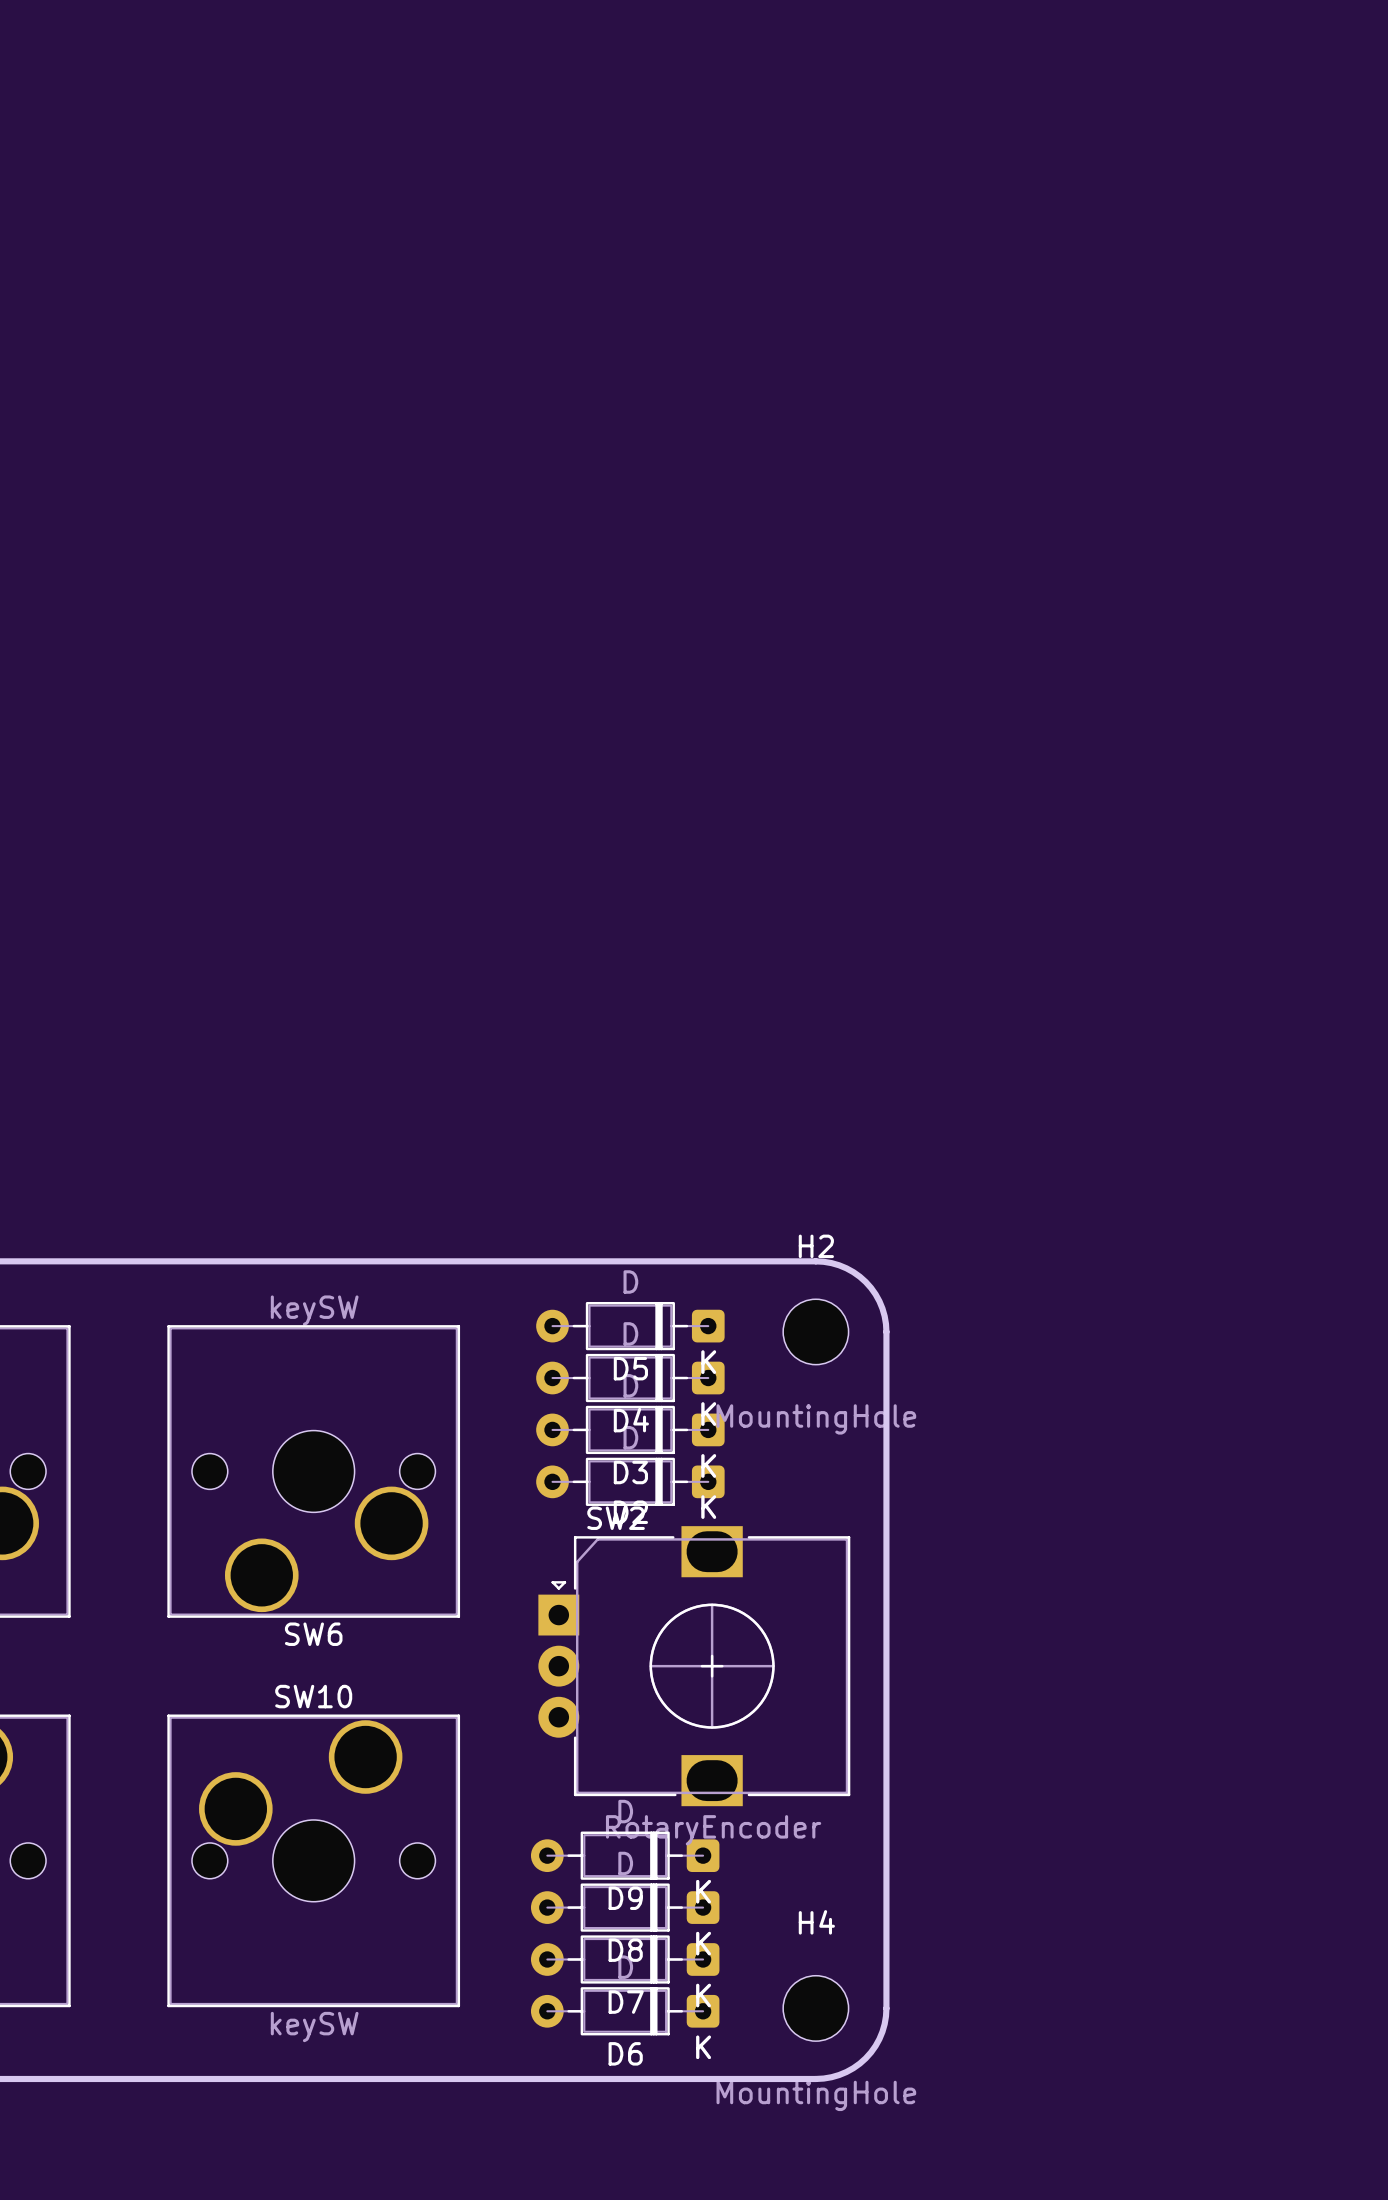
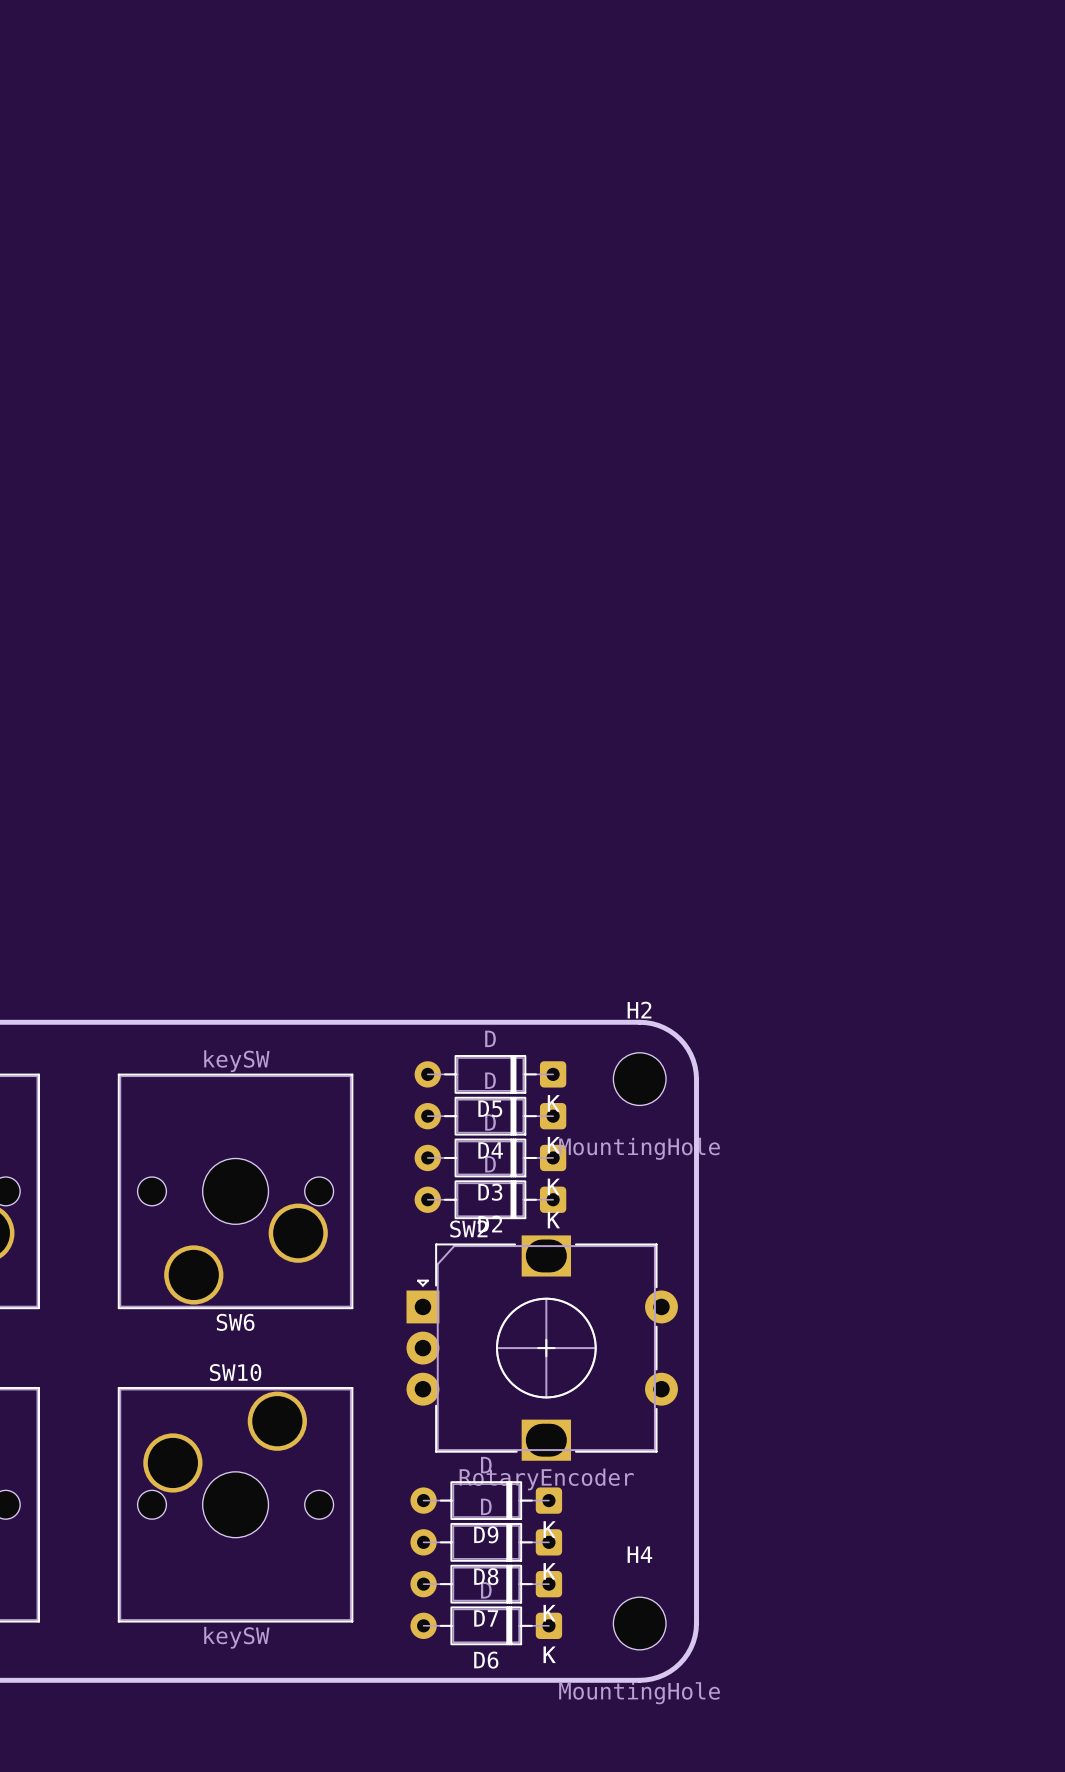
SW2 footprint: [538, 1526, 851, 1807] -> [406, 1235, 678, 1461]

